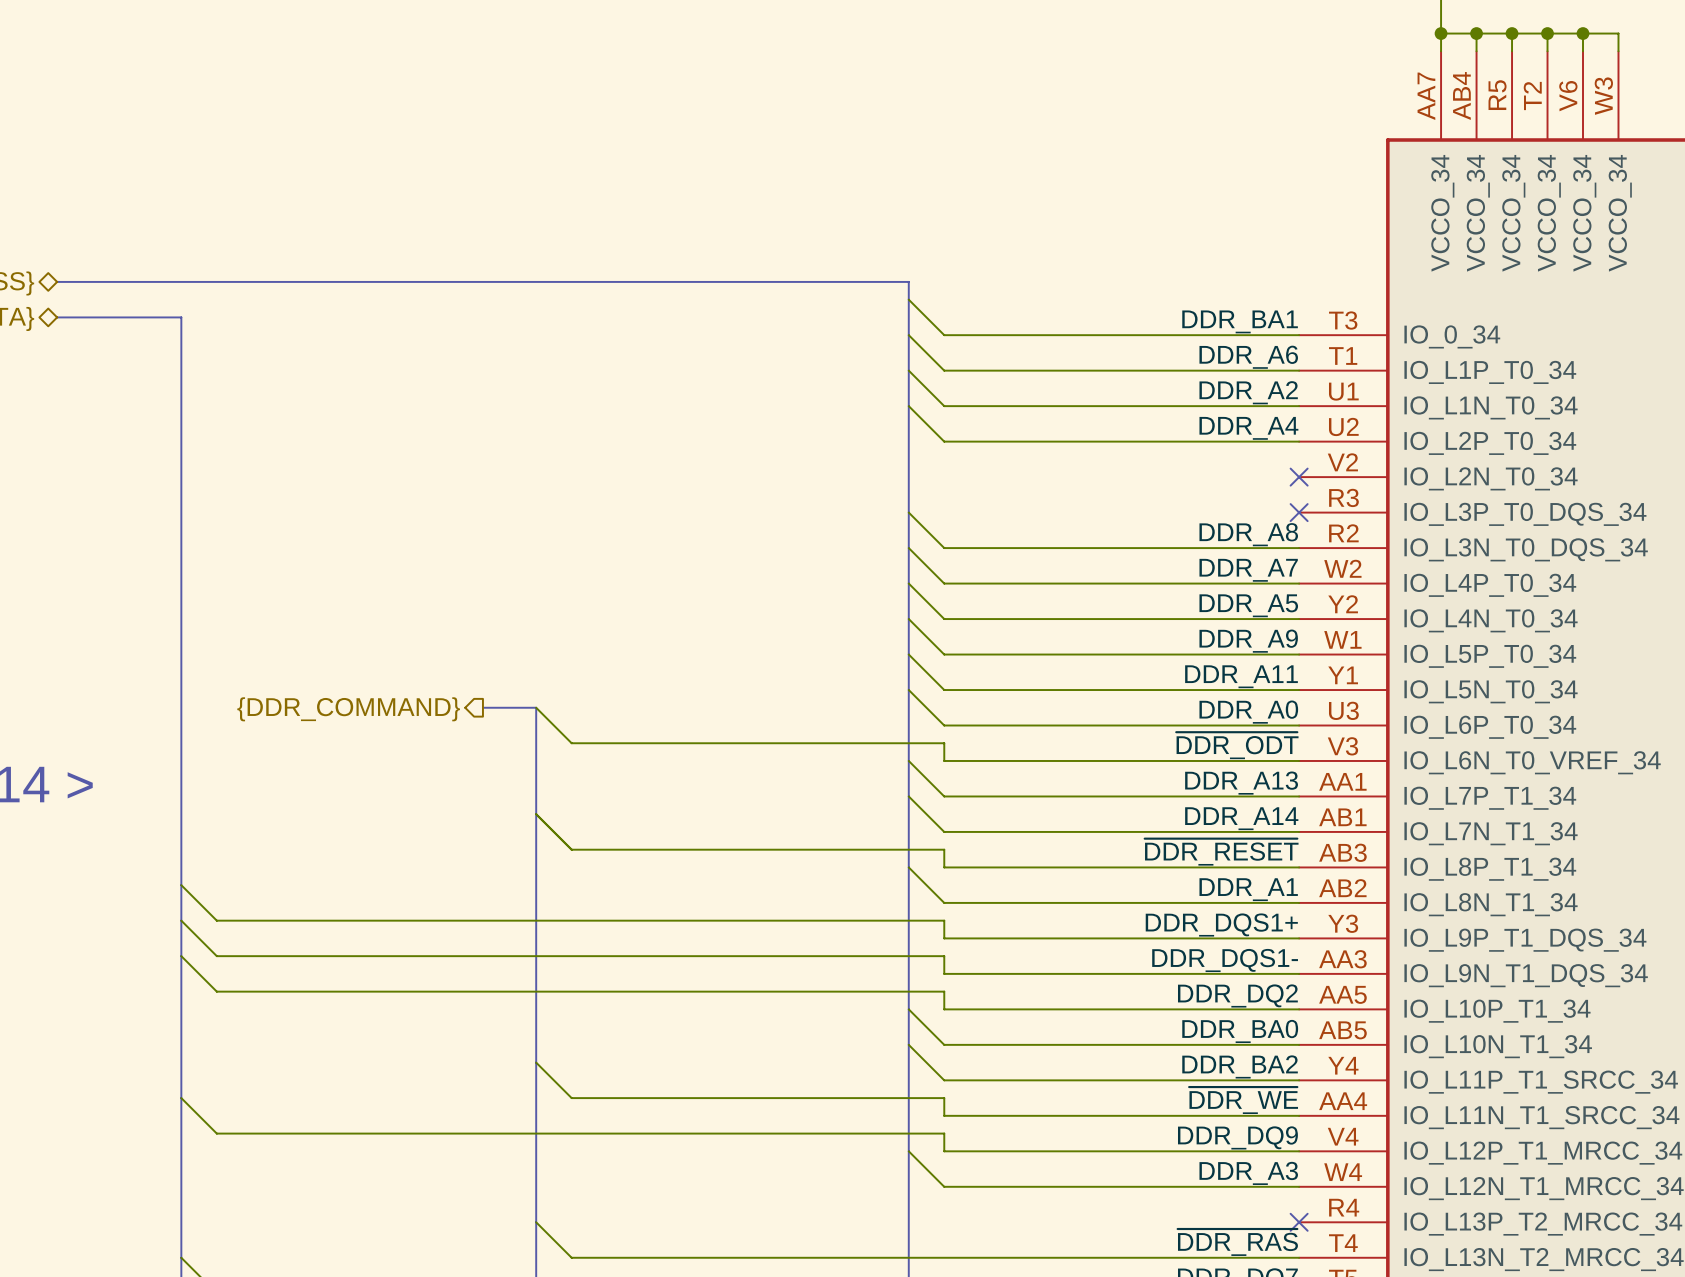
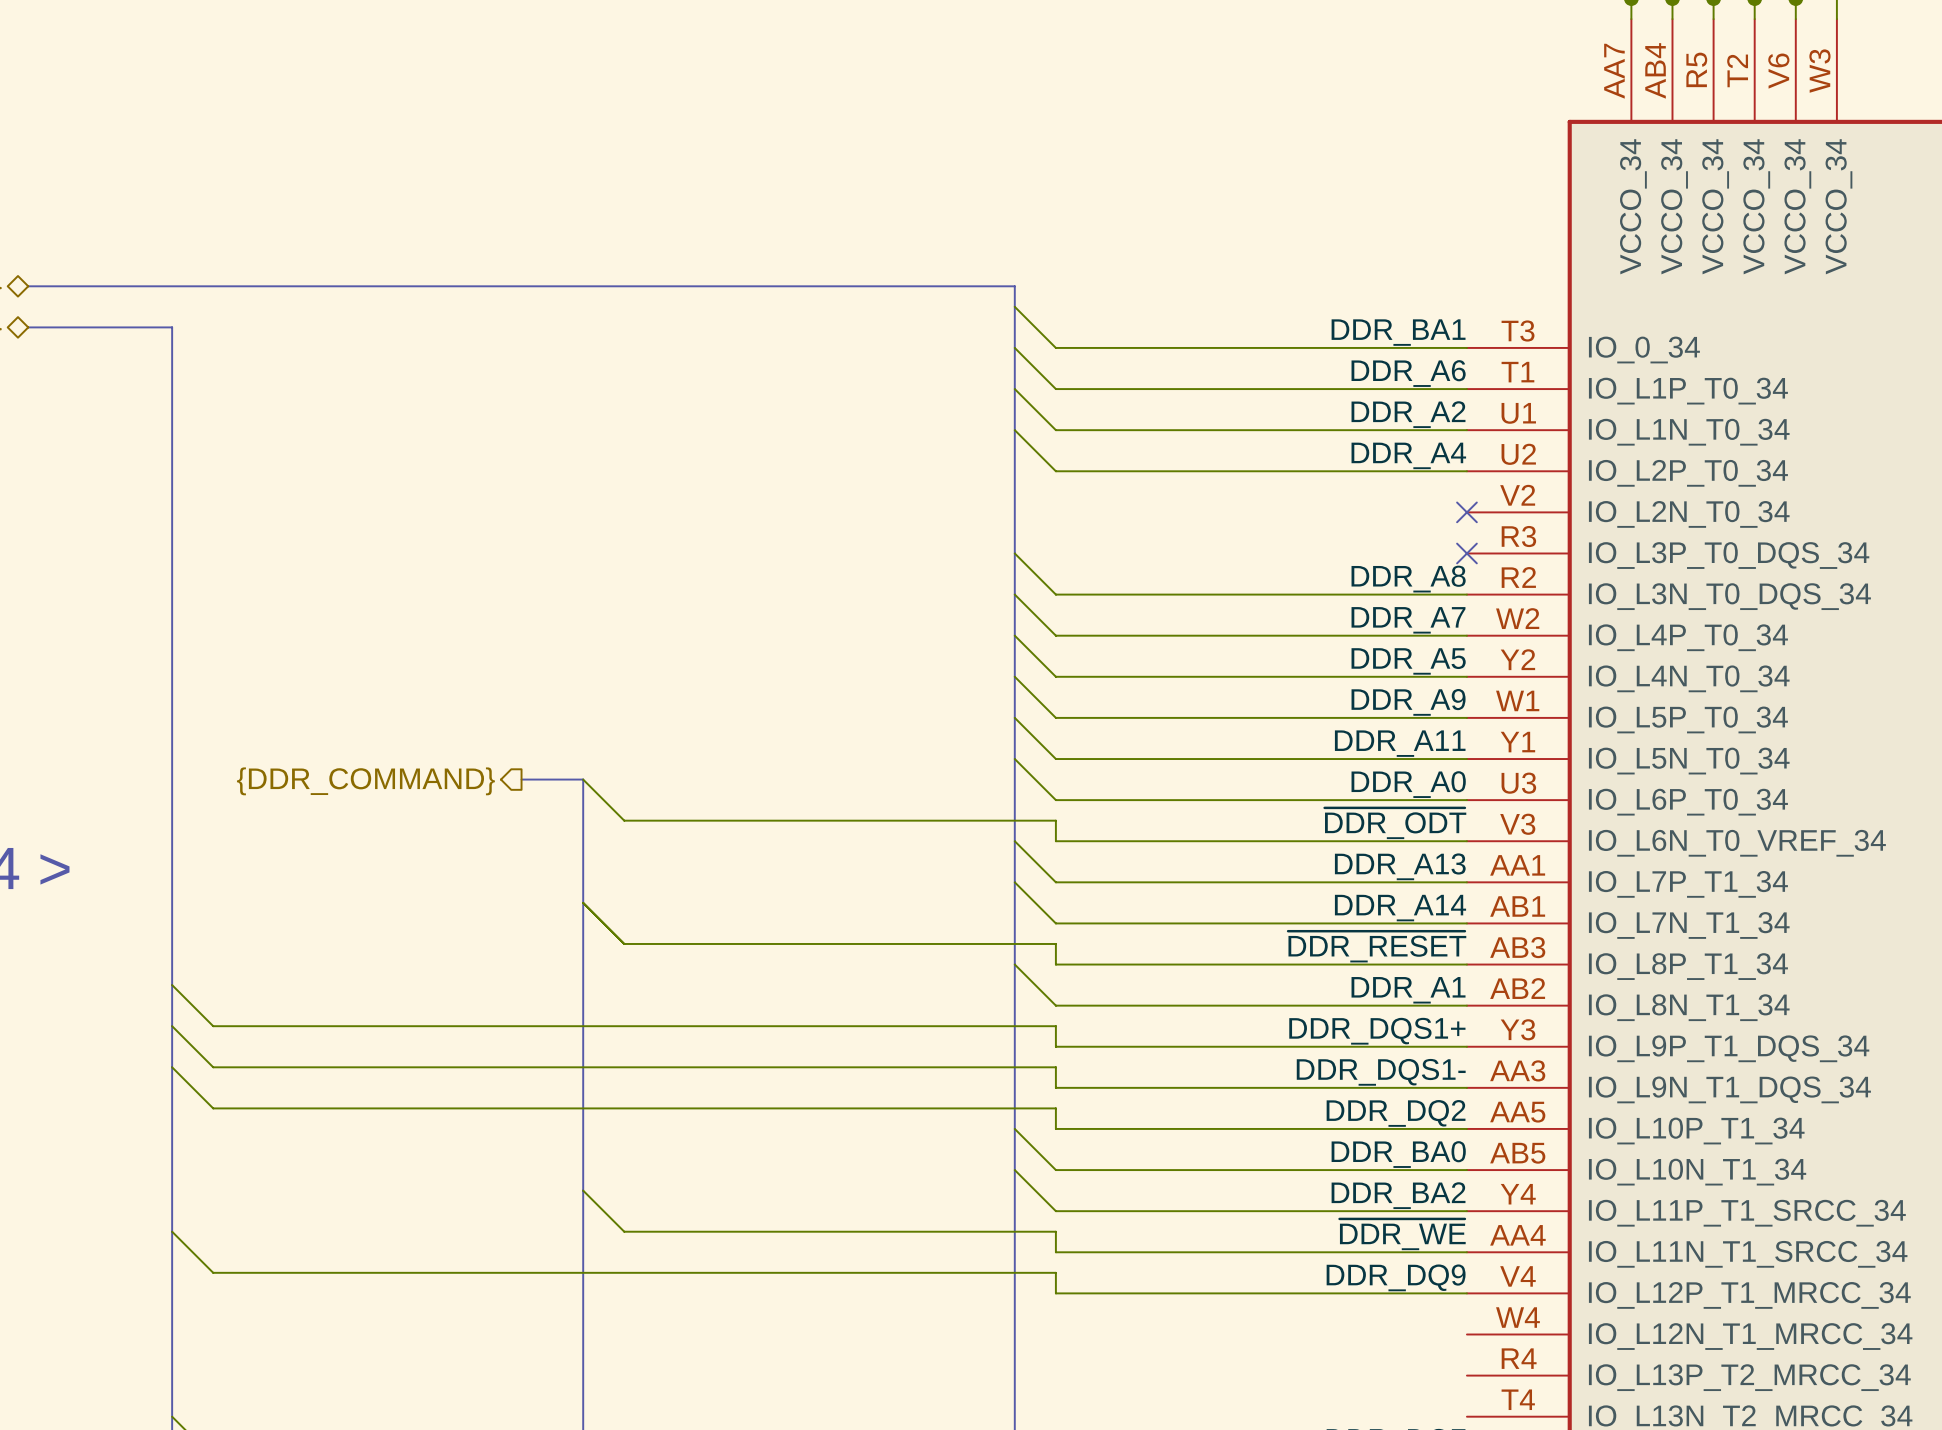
wire: (908, 1151) (944, 1186) (1299, 1186) -> none
label: DDR_A3 (1248, 1173) -> none
wire: (536, 1222) (571, 1257) (1299, 1257) -> none
no-connect mark: (1299, 1222) -> none
label: ~{DDR_RAS} (1237, 1242) -> none

